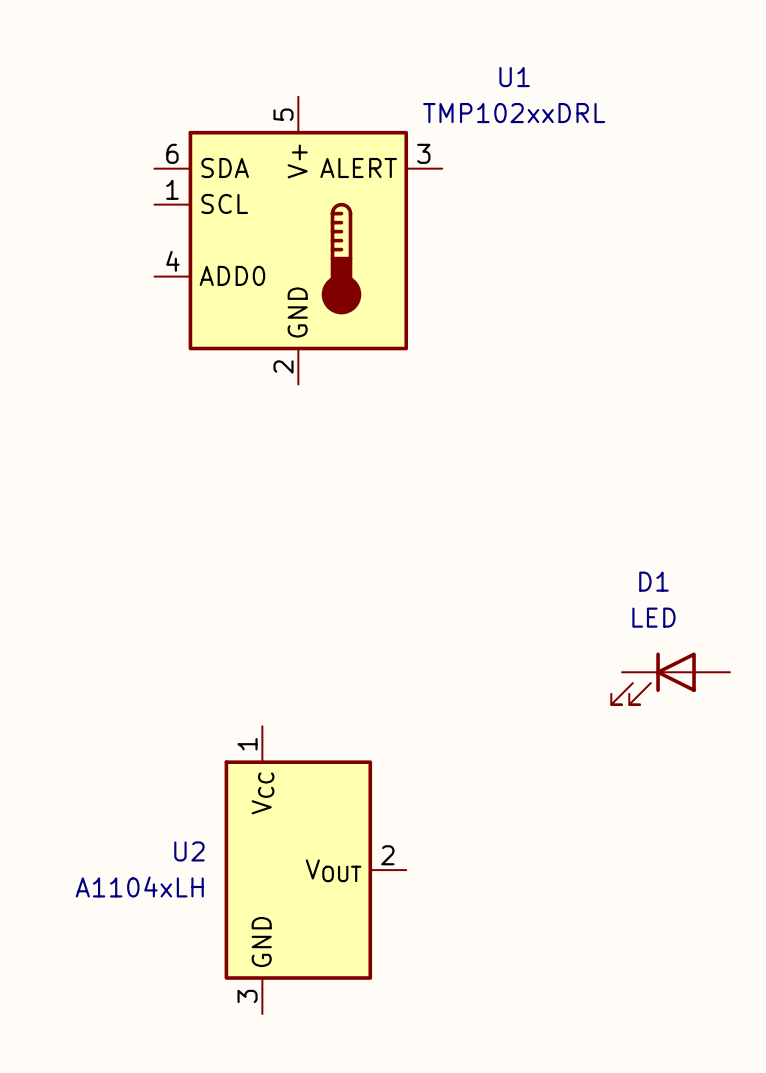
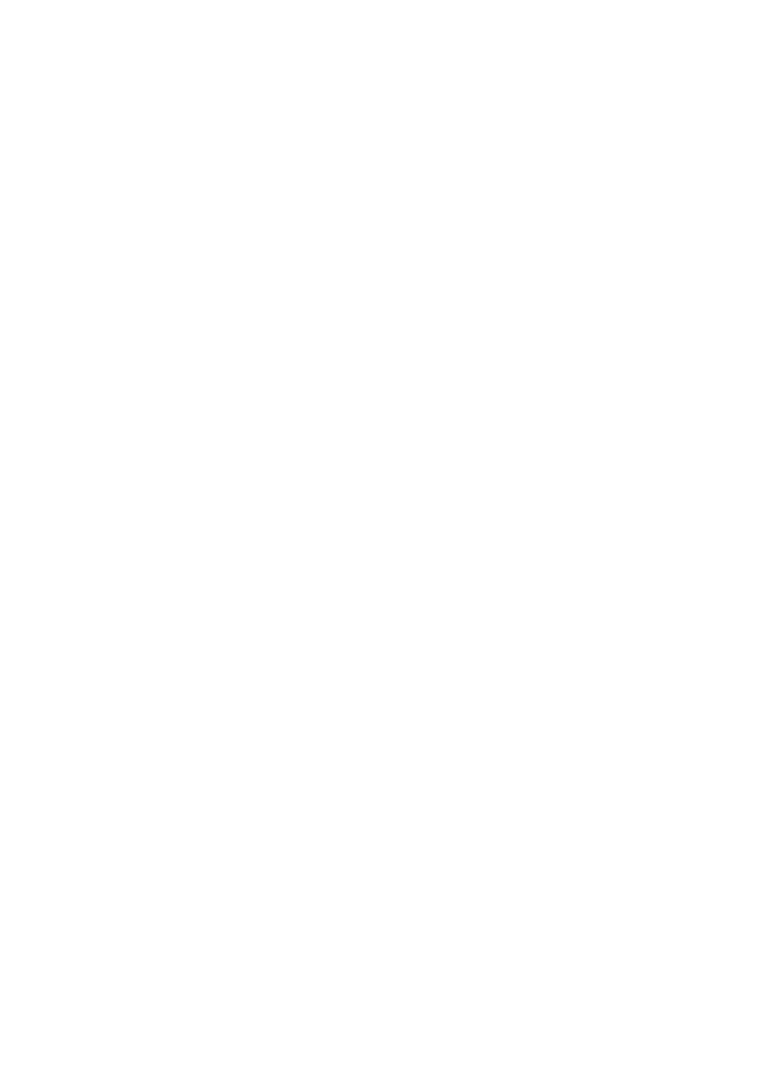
U1: TMP102xxDRL (298, 240) -> none
D1: LED (670, 678) -> none
U2: A1104xLH (315, 870) -> none

